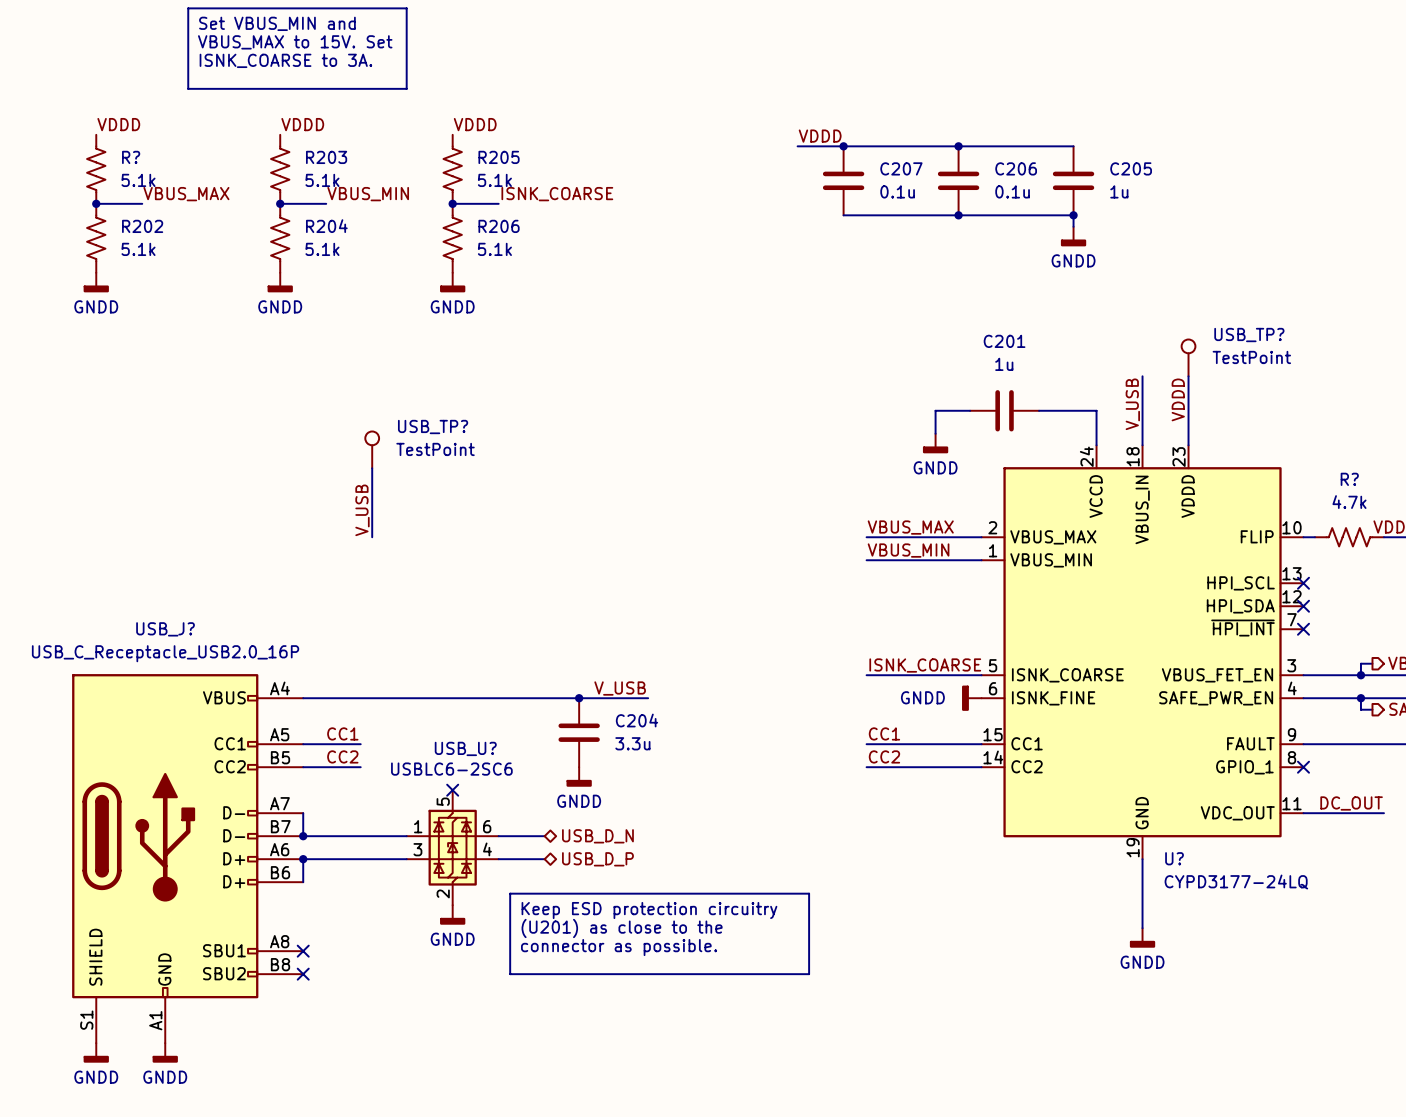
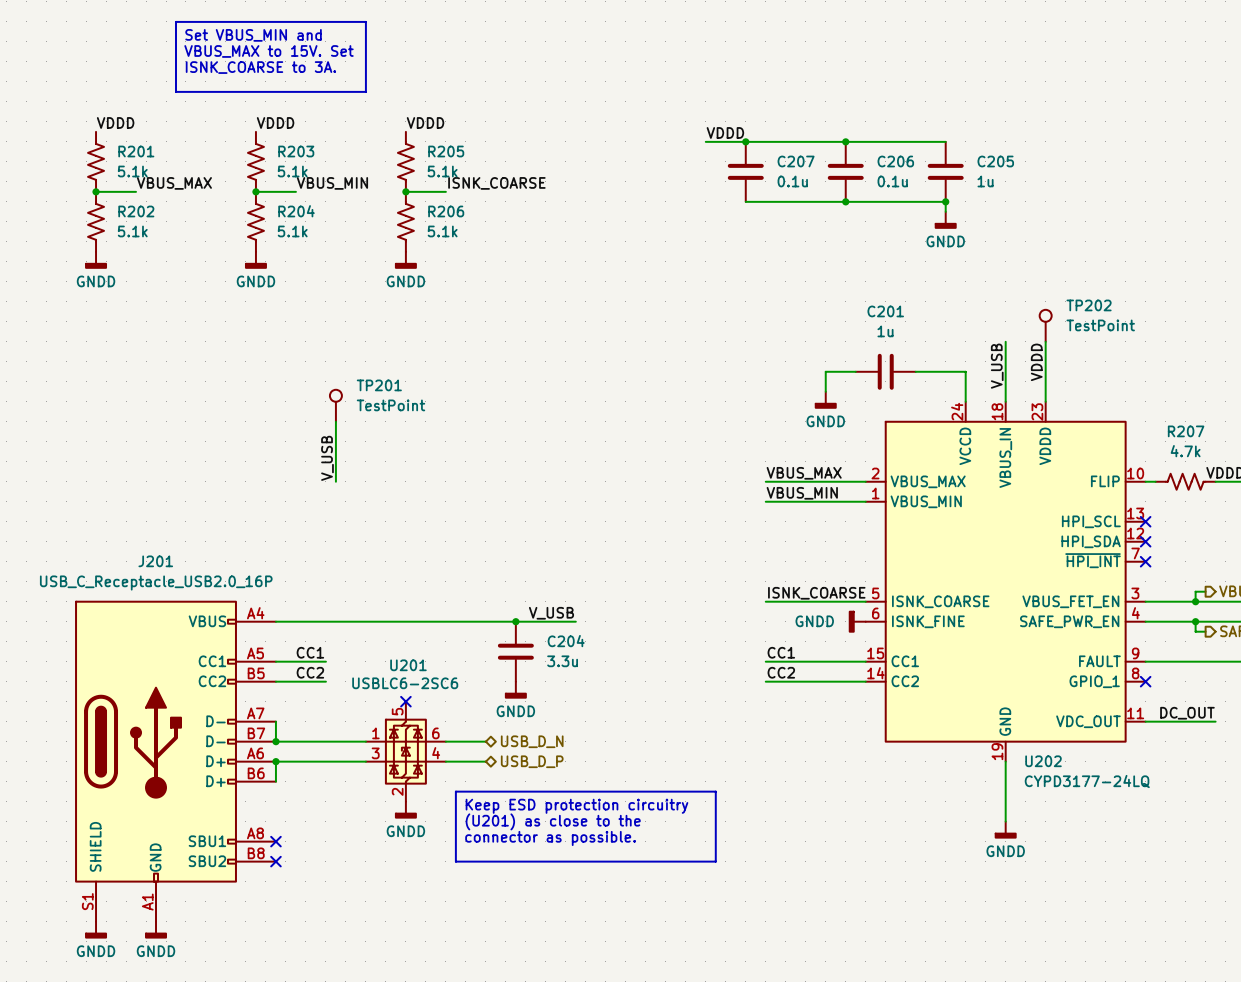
R? name: R? (131, 157) -> R201 (136, 151)
USB_TP? name: USB_TP? (1249, 335) -> TP202 (1089, 305)
USB_TP? name: USB_TP? (433, 427) -> TP201 (379, 385)
R? name: R? (1349, 479) -> R207 (1186, 431)
USB_J? name: USB_J? (165, 629) -> J201 (155, 561)
USB_U? name: USB_U? (465, 748) -> U201 (408, 665)
U? name: U? (1174, 858) -> U202 (1043, 761)

